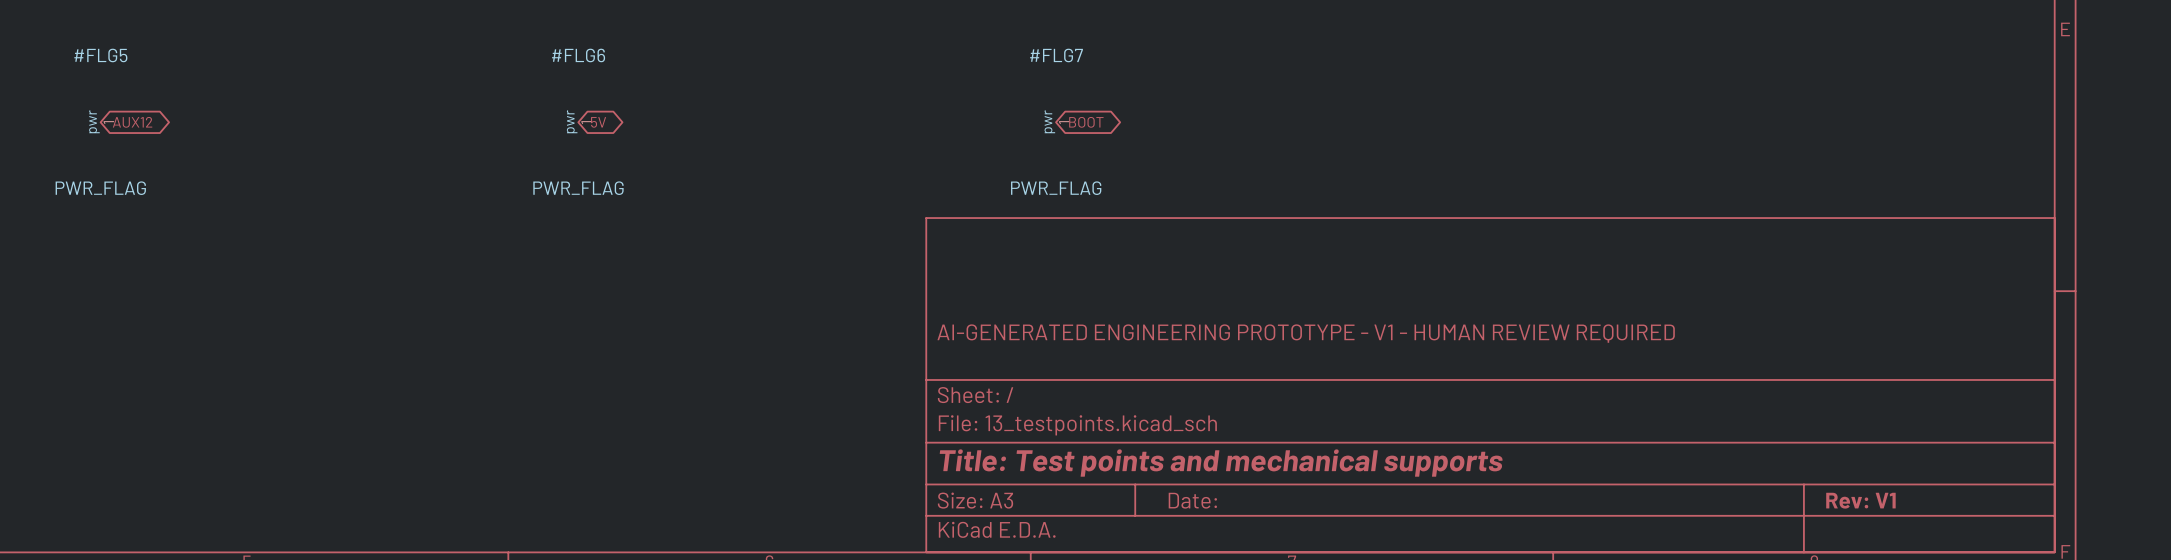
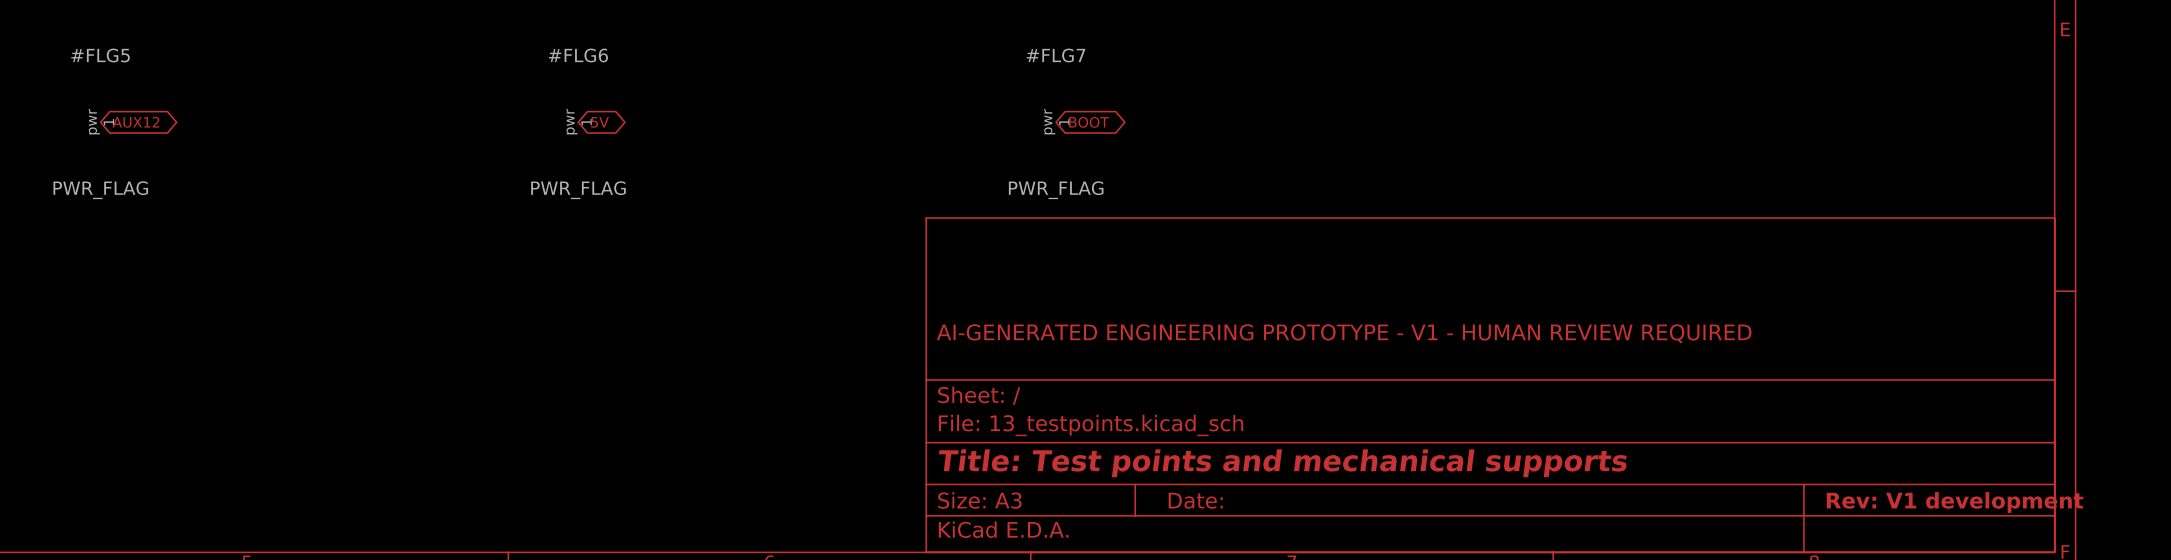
title block: Rev: V1 (1860, 500) -> Rev: V1 development (1955, 502)

